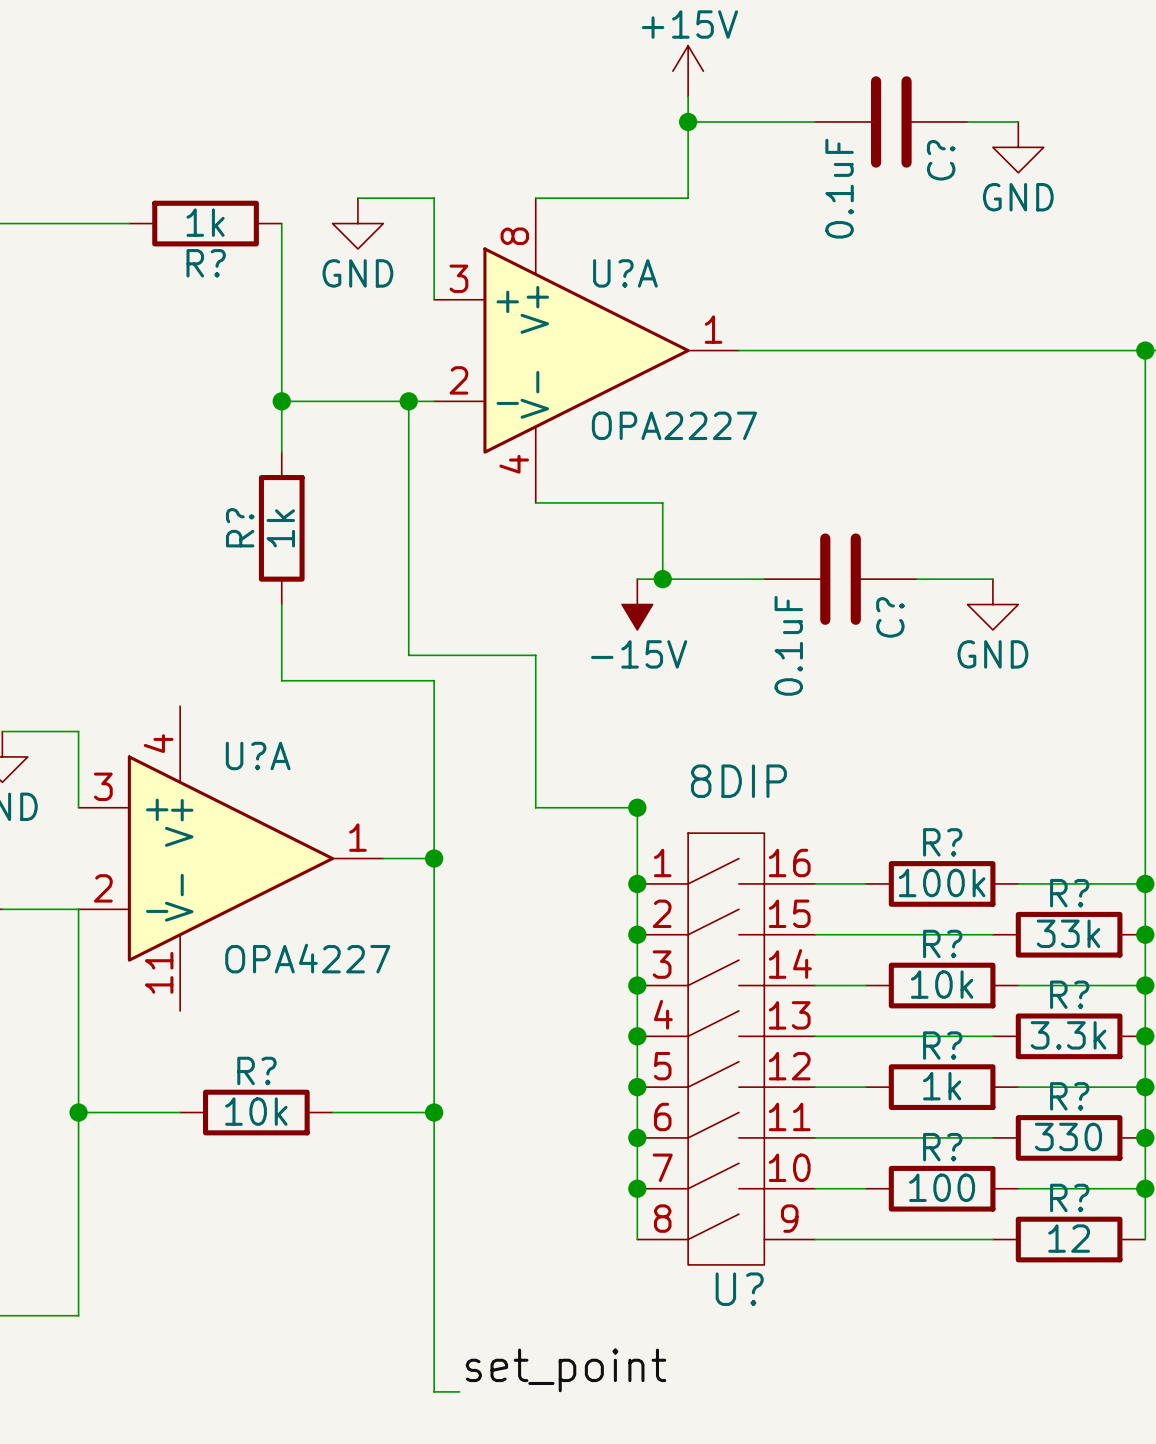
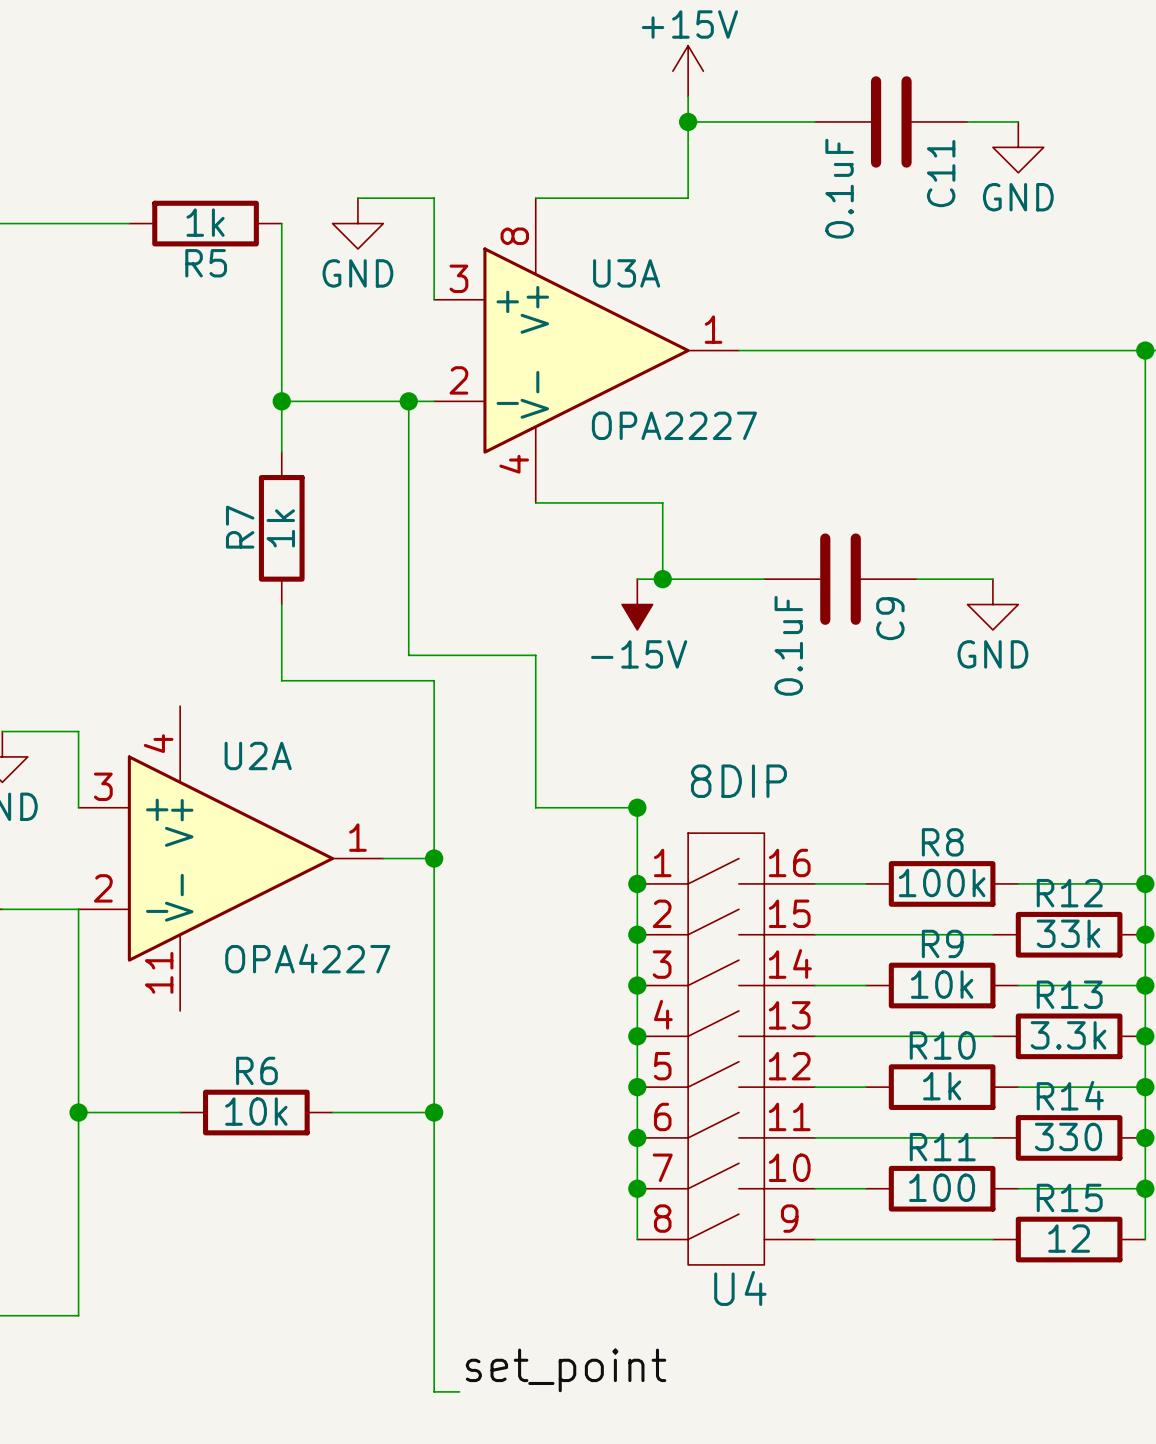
C? name: C? (941, 160) -> C11 (941, 173)
R? name: R? (206, 263) -> R5 (206, 263)
U?A name: U?A (625, 273) -> U3A (626, 273)
R? name: R? (240, 527) -> R7 (240, 527)
C? name: C? (890, 617) -> C9 (890, 618)
U?A name: U?A (258, 755) -> U2A (258, 755)
R? name: R? (942, 842) -> R8 (942, 842)
R? name: R? (1069, 893) -> R12 (1069, 893)
R? name: R? (942, 943) -> R9 (942, 943)
R? name: R? (1069, 994) -> R13 (1069, 994)
R? name: R? (942, 1045) -> R10 (942, 1045)
R? name: R? (256, 1070) -> R6 (256, 1070)
R? name: R? (1069, 1096) -> R14 (1070, 1095)
R? name: R? (942, 1147) -> R11 (942, 1147)
R? name: R? (1069, 1197) -> R15 (1069, 1197)
U? name: U? (739, 1289) -> U4 (740, 1288)

